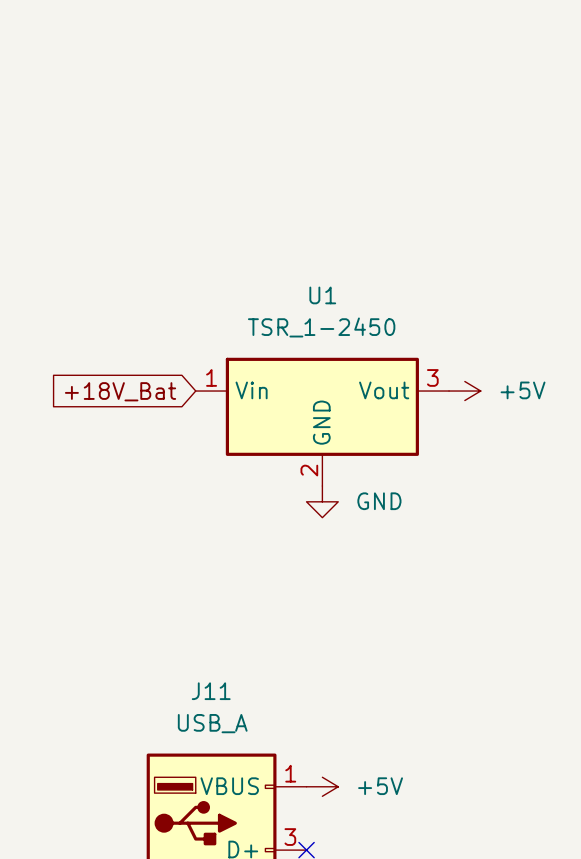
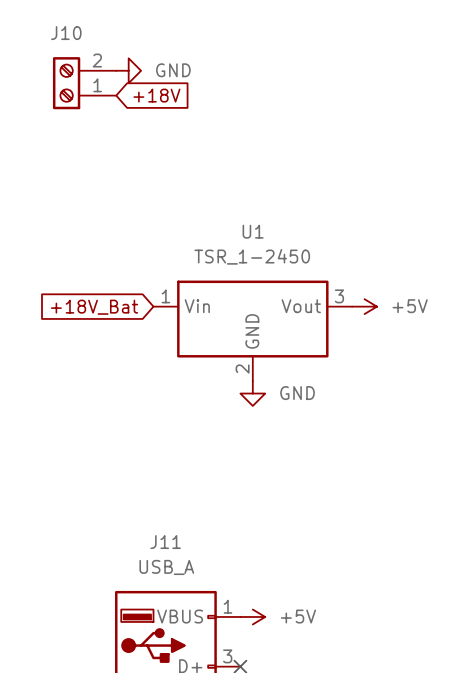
power symbol: none -> GND (128, 70)
J10: none -> (84, 83)
global label: none -> +18V (156, 95)

